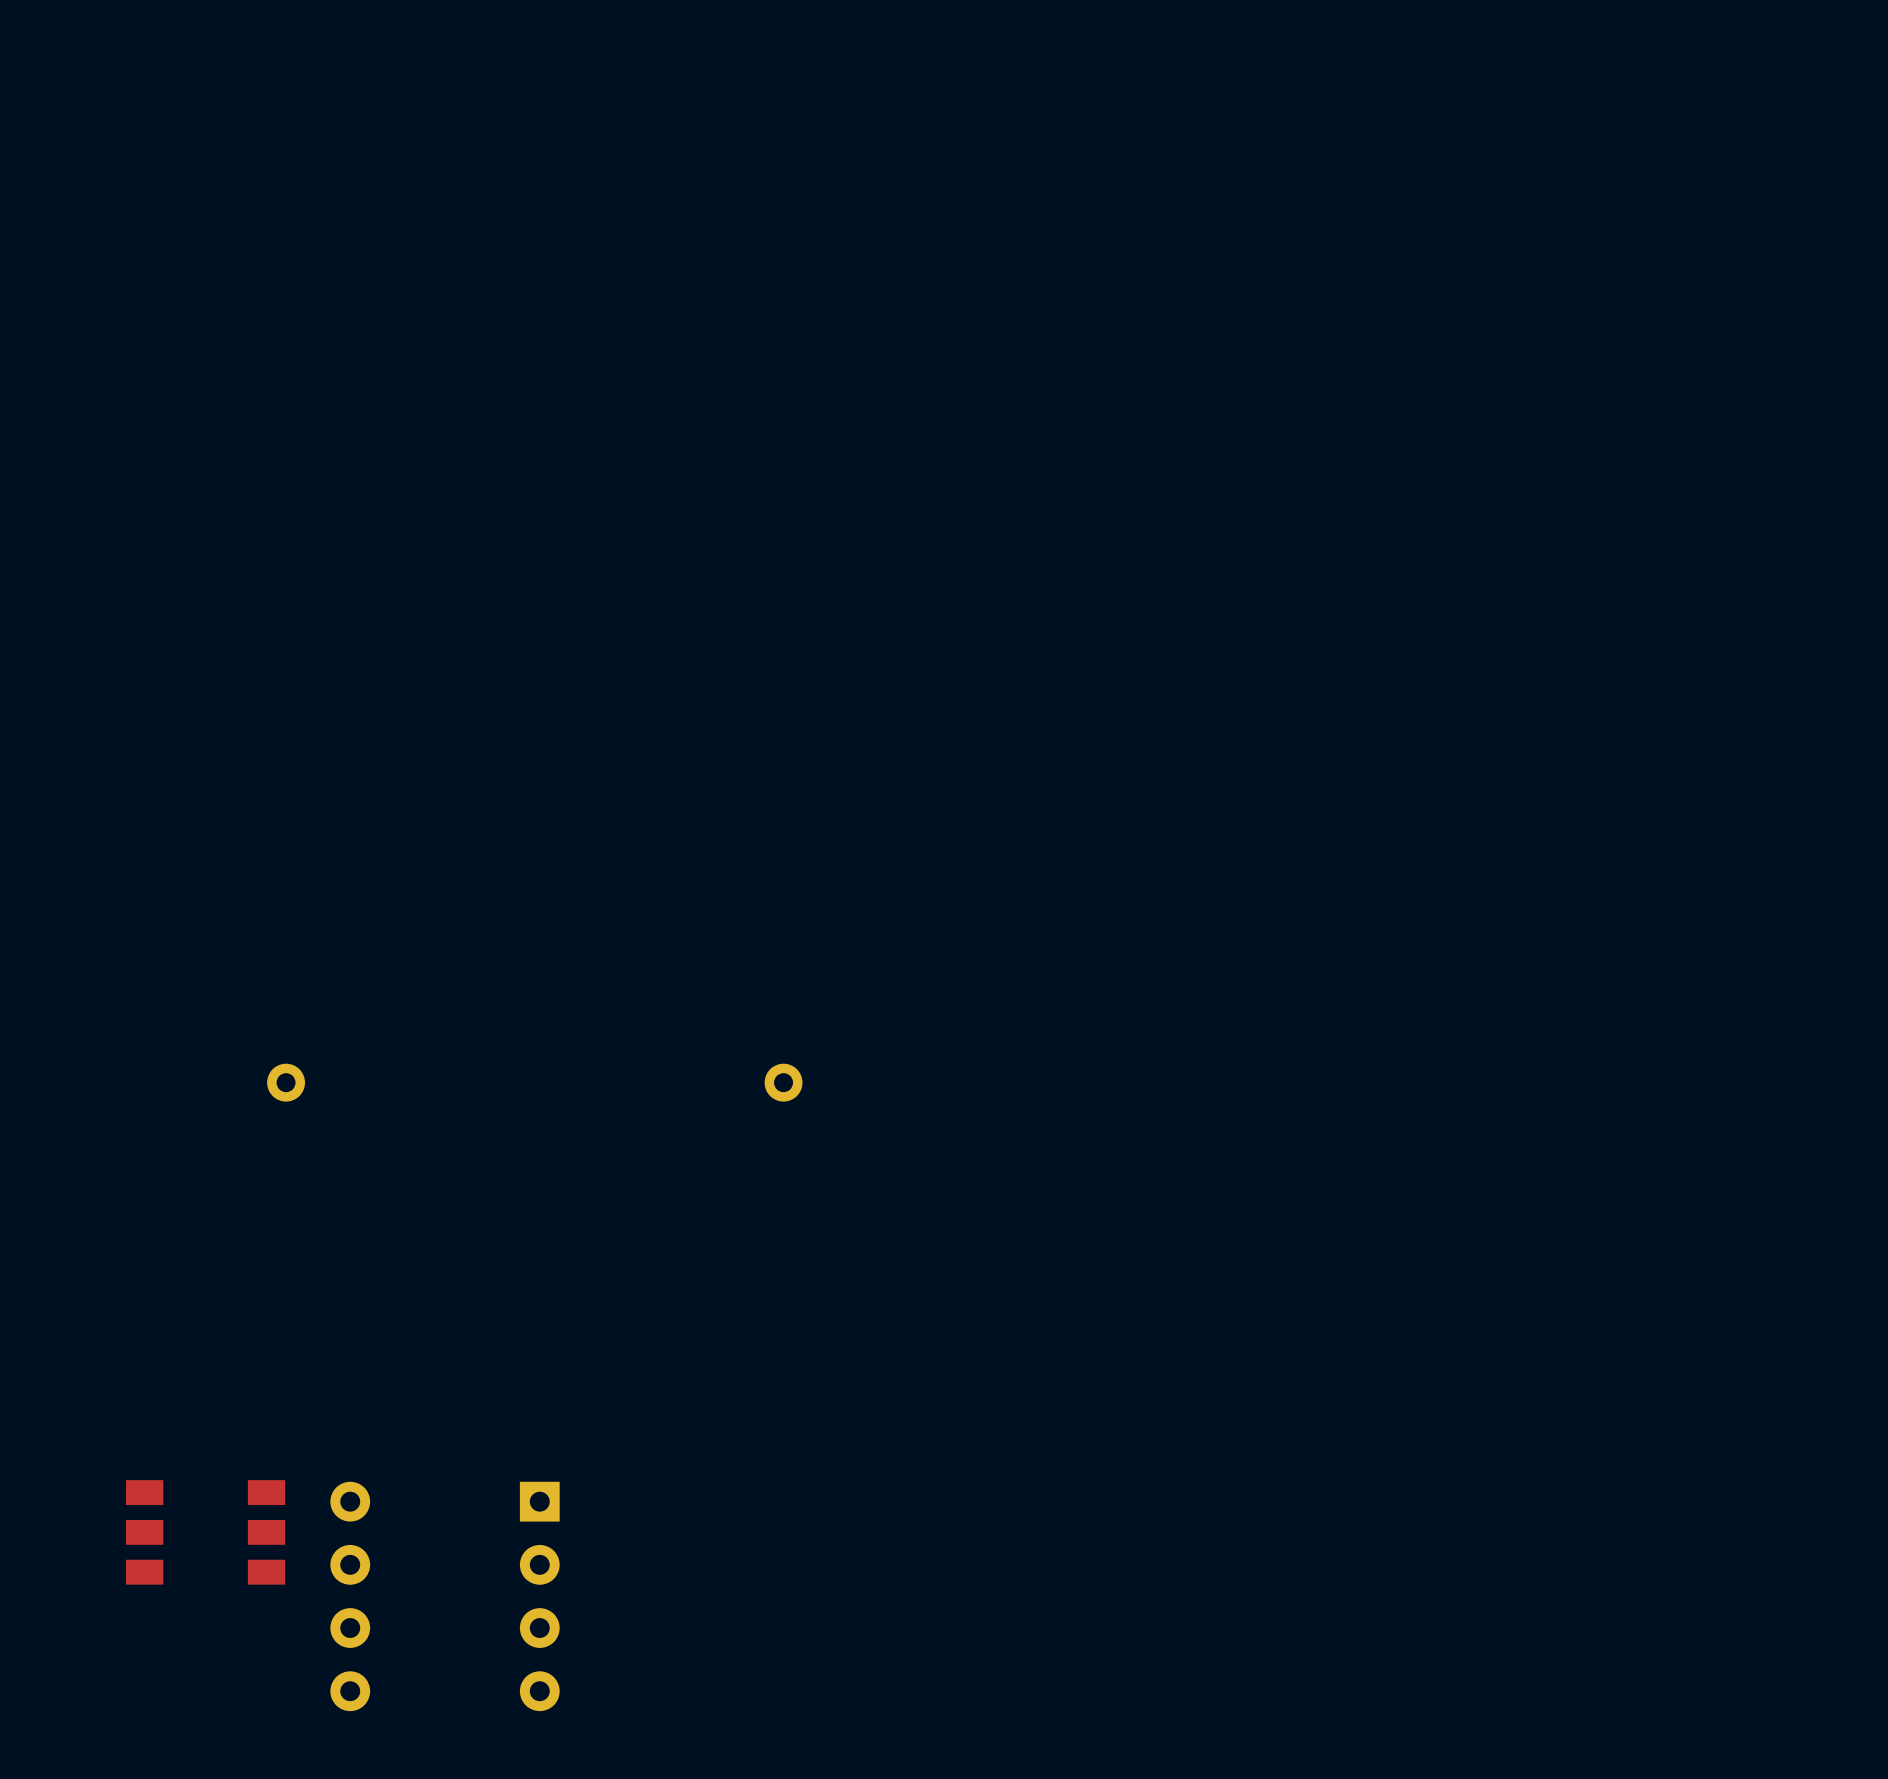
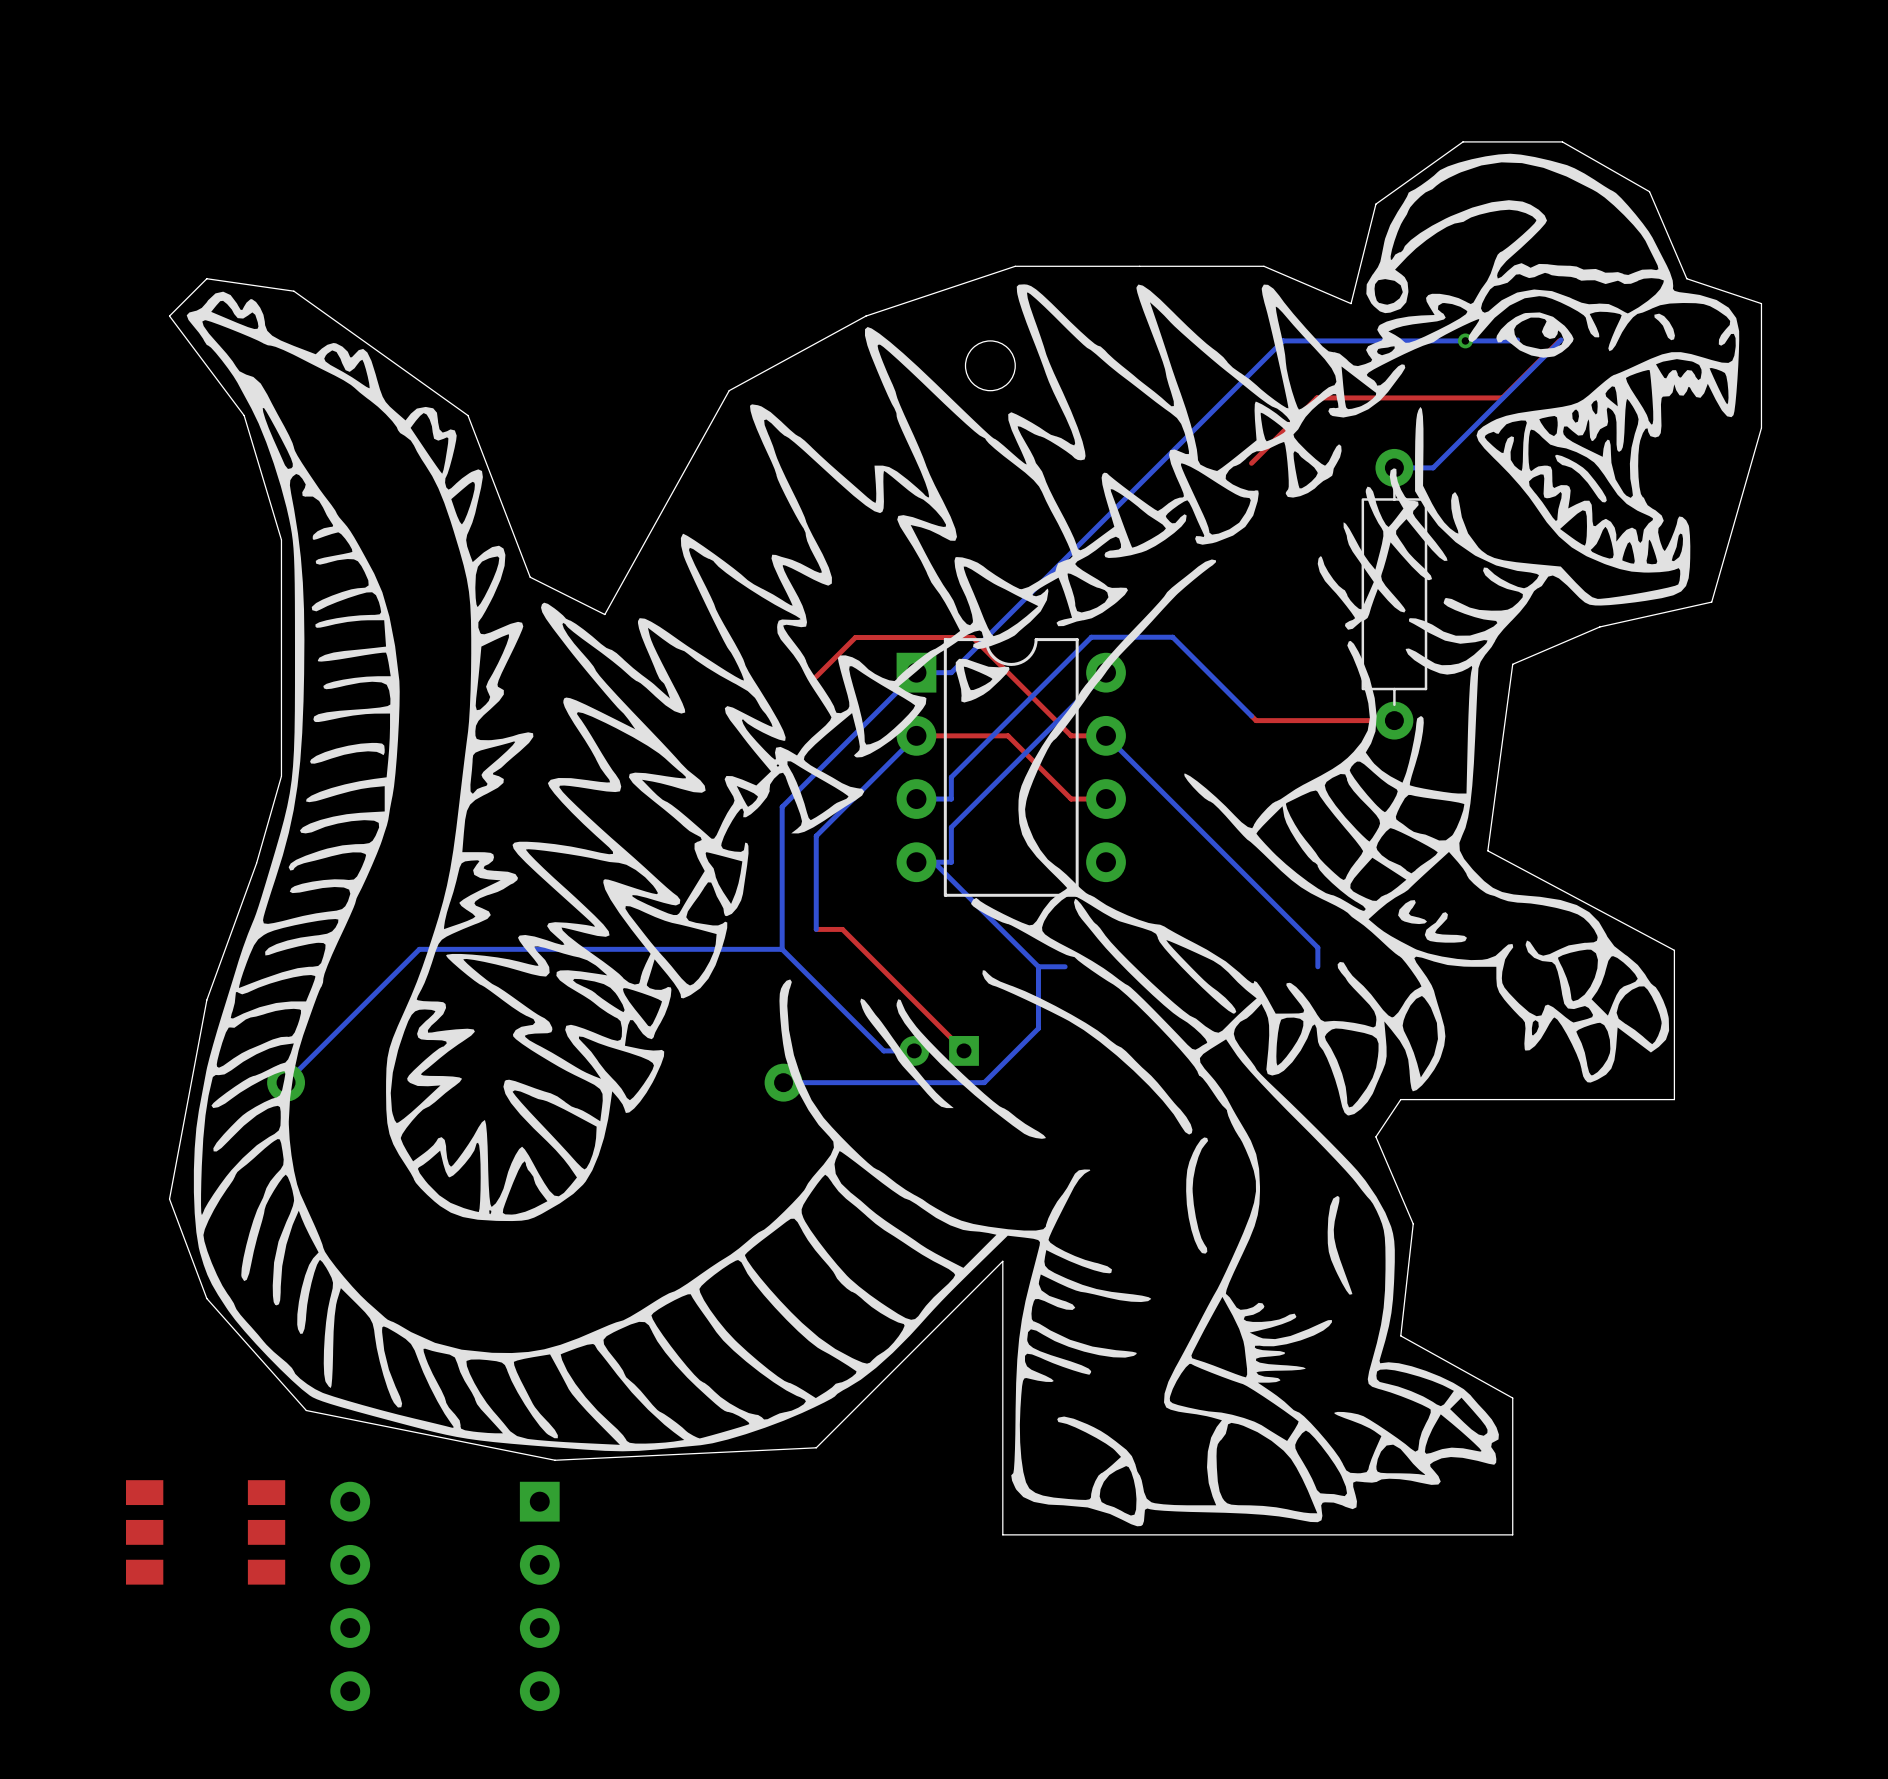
board edge: none -> (1562, 141) (1462, 141) (1375, 204) (1351, 303) (1263, 266) (1015, 266) (866, 316) (729, 390) (604, 614) (530, 577) (468, 415) (293, 291) (206, 278) (169, 316) (244, 415) (281, 539) (281, 776) (256, 863) (206, 1000) (169, 1199) (206, 1298) (306, 1410) (555, 1460) (816, 1447) (1002, 1261) (1002, 1534) (1512, 1534) (1512, 1398) (1400, 1335) (1413, 1223) (1375, 1136) (1400, 1099) (1674, 1099) (1674, 950) (1487, 850) (1512, 664) (1599, 626) (1711, 602) (1761, 427) (1761, 303) (1686, 278) (1649, 191) (1562, 141)
drawing: none -> [186, 153, 1740, 1527]
bottom track: none -> (1517, 339) (1283, 340) (951, 672) (916, 672) (782, 806) (782, 949)
bottom track: none -> (1561, 339) (1433, 467) (1394, 467)
round board edge: none -> [964, 340, 1016, 392]
via: none -> (1465, 340)
top track: none -> (1559, 340) (1502, 397) (1316, 397) (1251, 463)
part: none -> (1394, 594)
bottom track: none -> (1106, 672) (951, 827) (951, 862) (916, 862)
top track: none -> (816, 676) (855, 637) (972, 637) (1071, 735) (1106, 735)
bottom track: none -> (1251, 716) (1172, 637) (1091, 637) (951, 777) (951, 799) (916, 799)
top track: none -> (1251, 716) (1256, 720) (1394, 720)
bottom track: none -> (916, 735) (816, 836) (816, 929)
top track: none -> (916, 735) (1007, 735) (1071, 799) (1106, 799)
bottom track: none -> (1106, 735) (1317, 947) (1317, 966)
part: none -> (1011, 767)
bottom track: none -> (933, 862) (1038, 966)
top track: none -> (816, 929) (842, 929) (964, 1050)
bottom track: none -> (782, 949) (883, 1050) (914, 1050)
bottom track: none -> (782, 949) (419, 949) (286, 1082)
bottom track: none -> (1038, 966) (1038, 1028) (984, 1082) (783, 1082)
bottom track: none -> (1065, 966) (1038, 966)
part: none -> (939, 1050)

